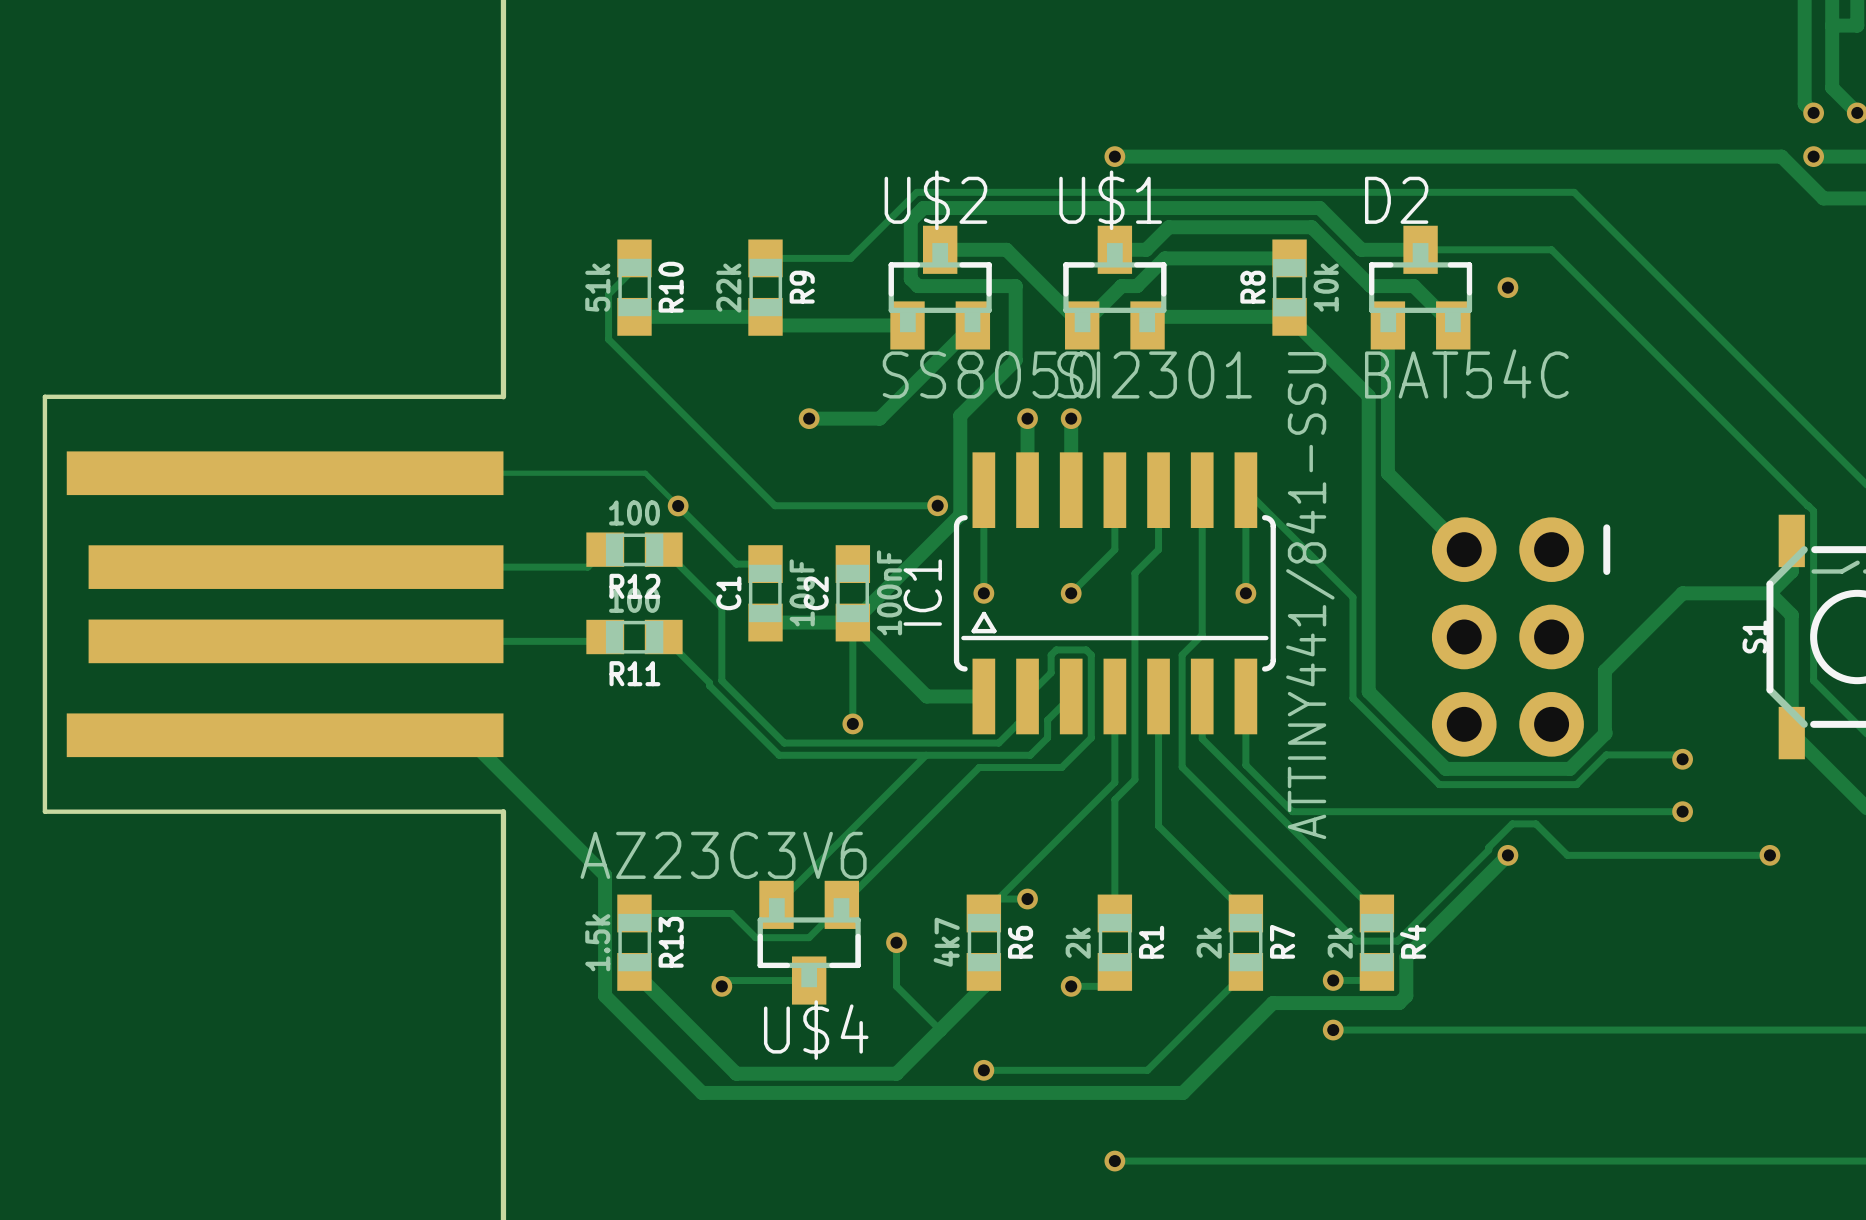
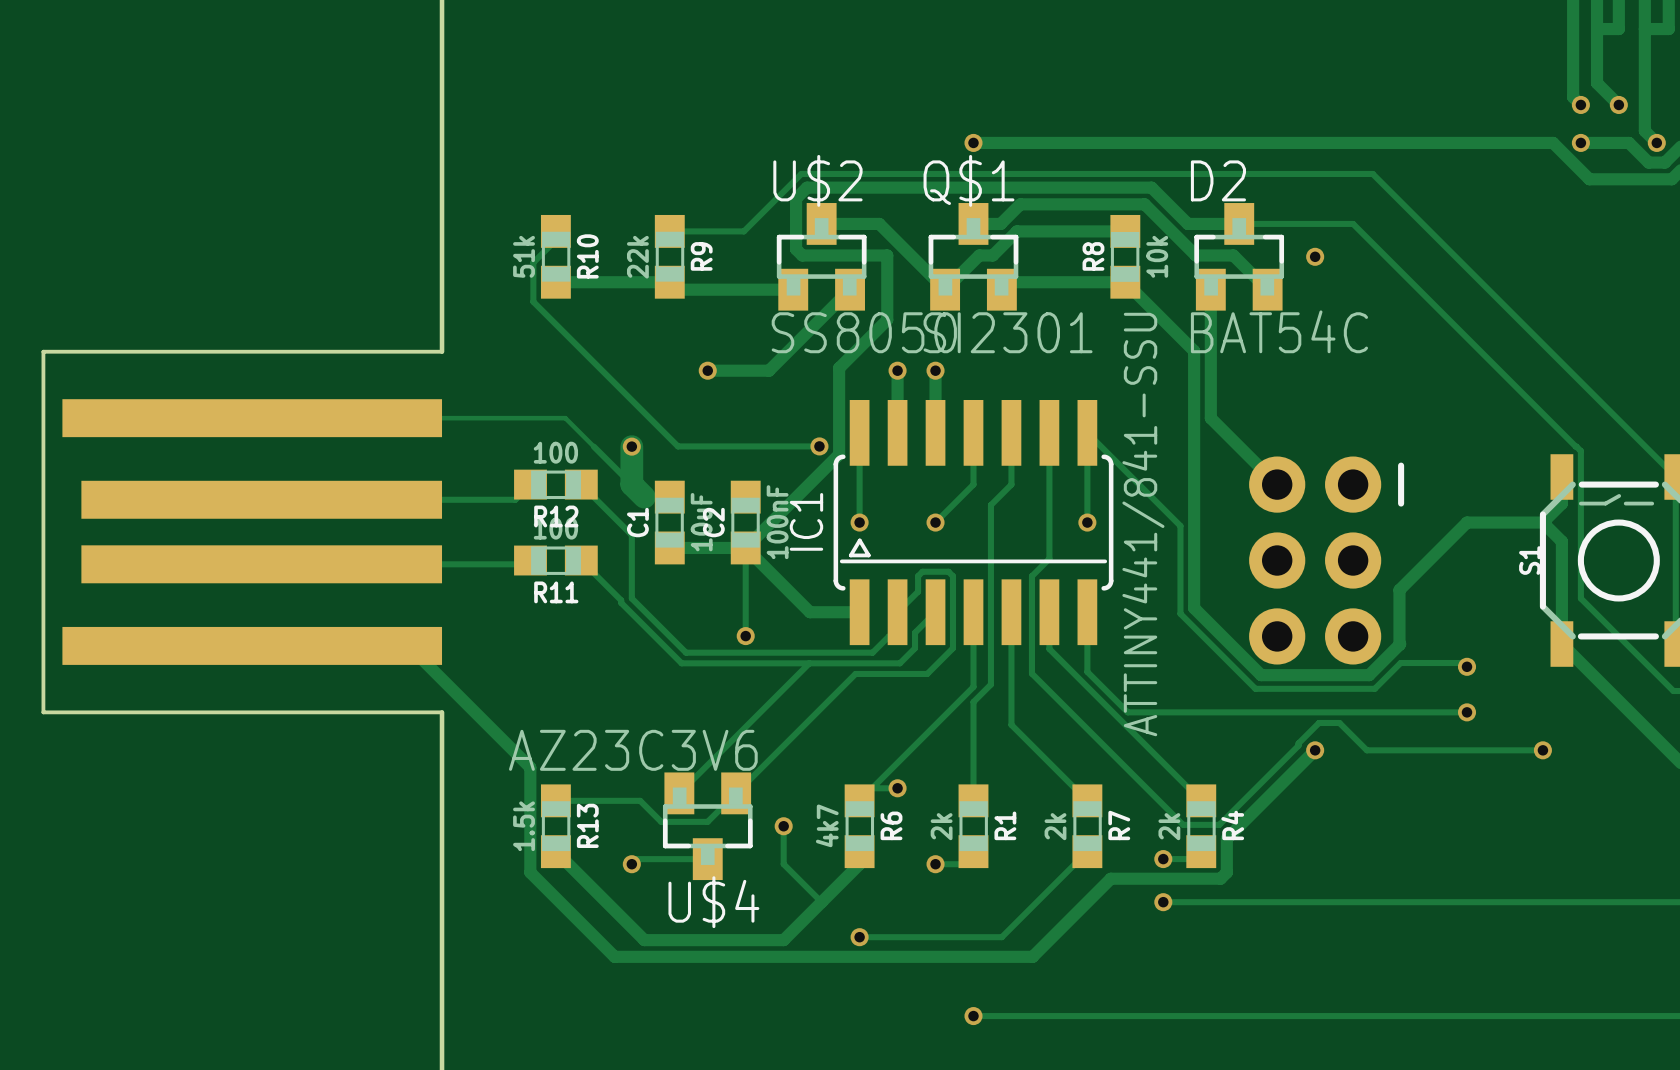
U$1 name: U$1 (1110, 200) -> Q$1 (968, 180)
via position: (678, 505) -> (631, 446)
track: none -> (631, 446) (631, 484) (644, 497)

